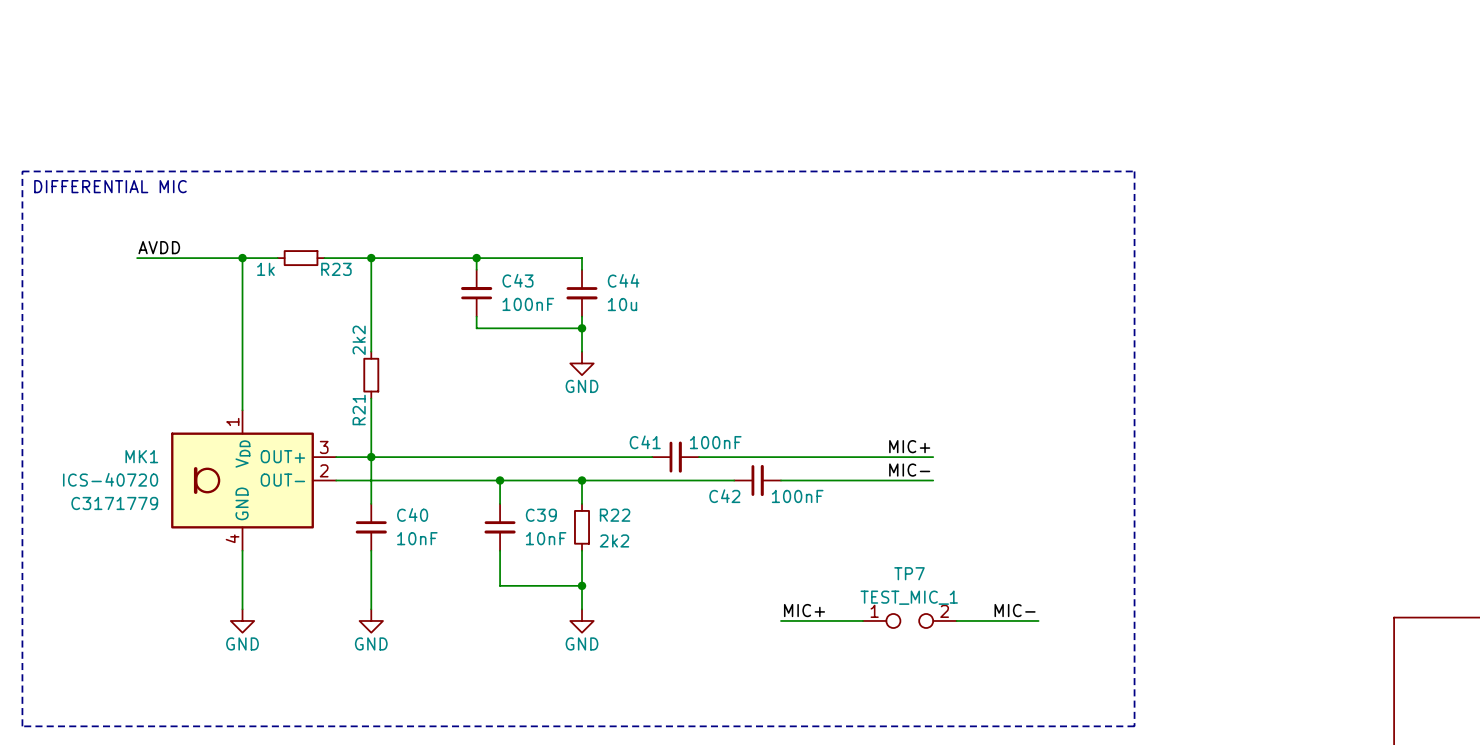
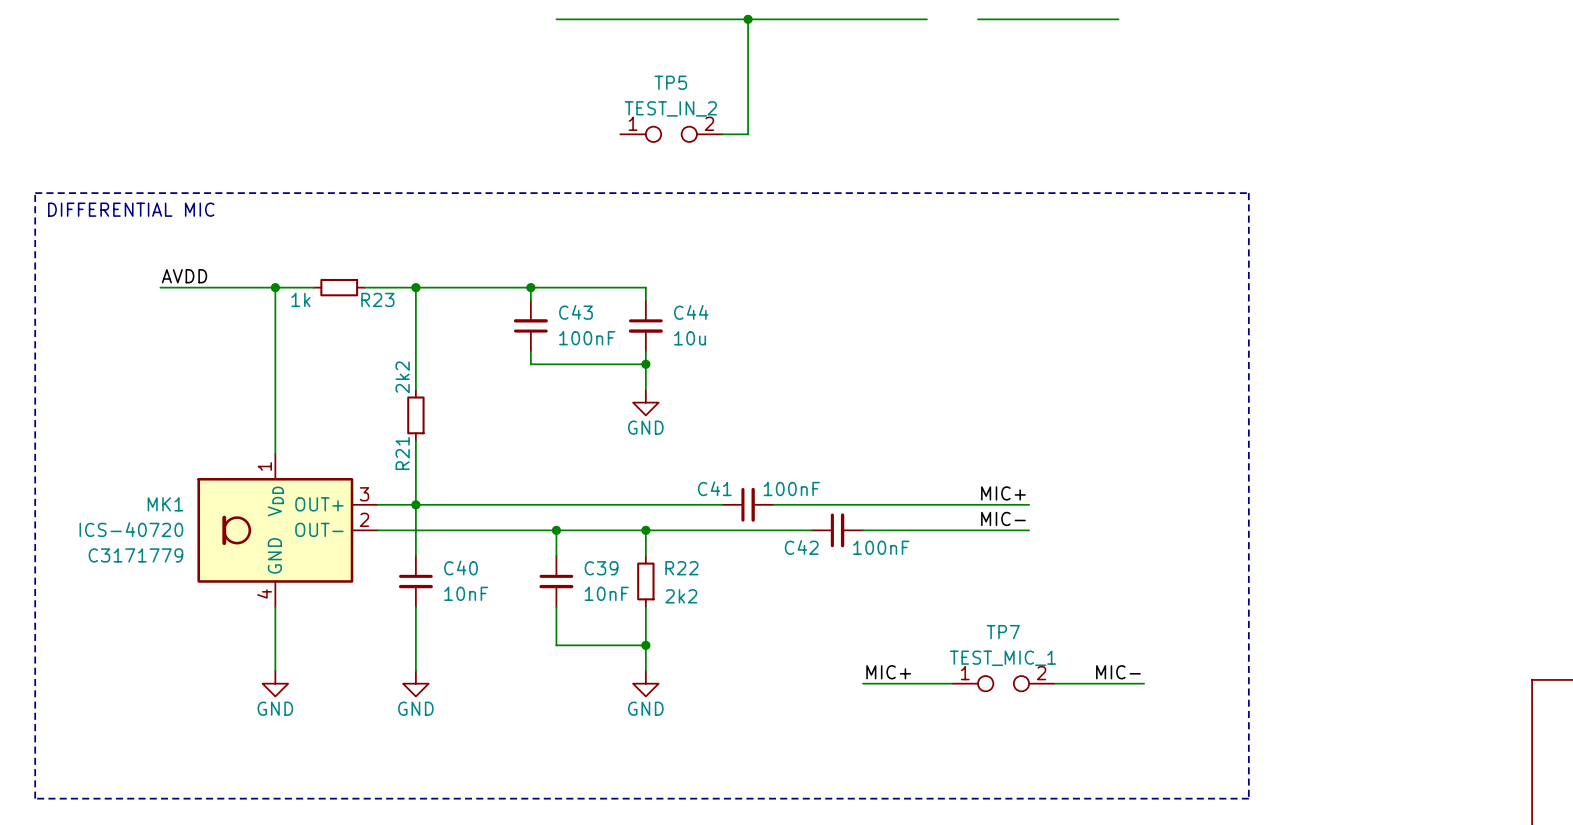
wire: none -> (556, 19) (926, 19)
wire: none -> (748, 19) (748, 134) (722, 134)
junction: none -> (748, 19)
wire: none -> (978, 19) (1118, 19)
TP5: none -> TEST_IN_2 (671, 134)

